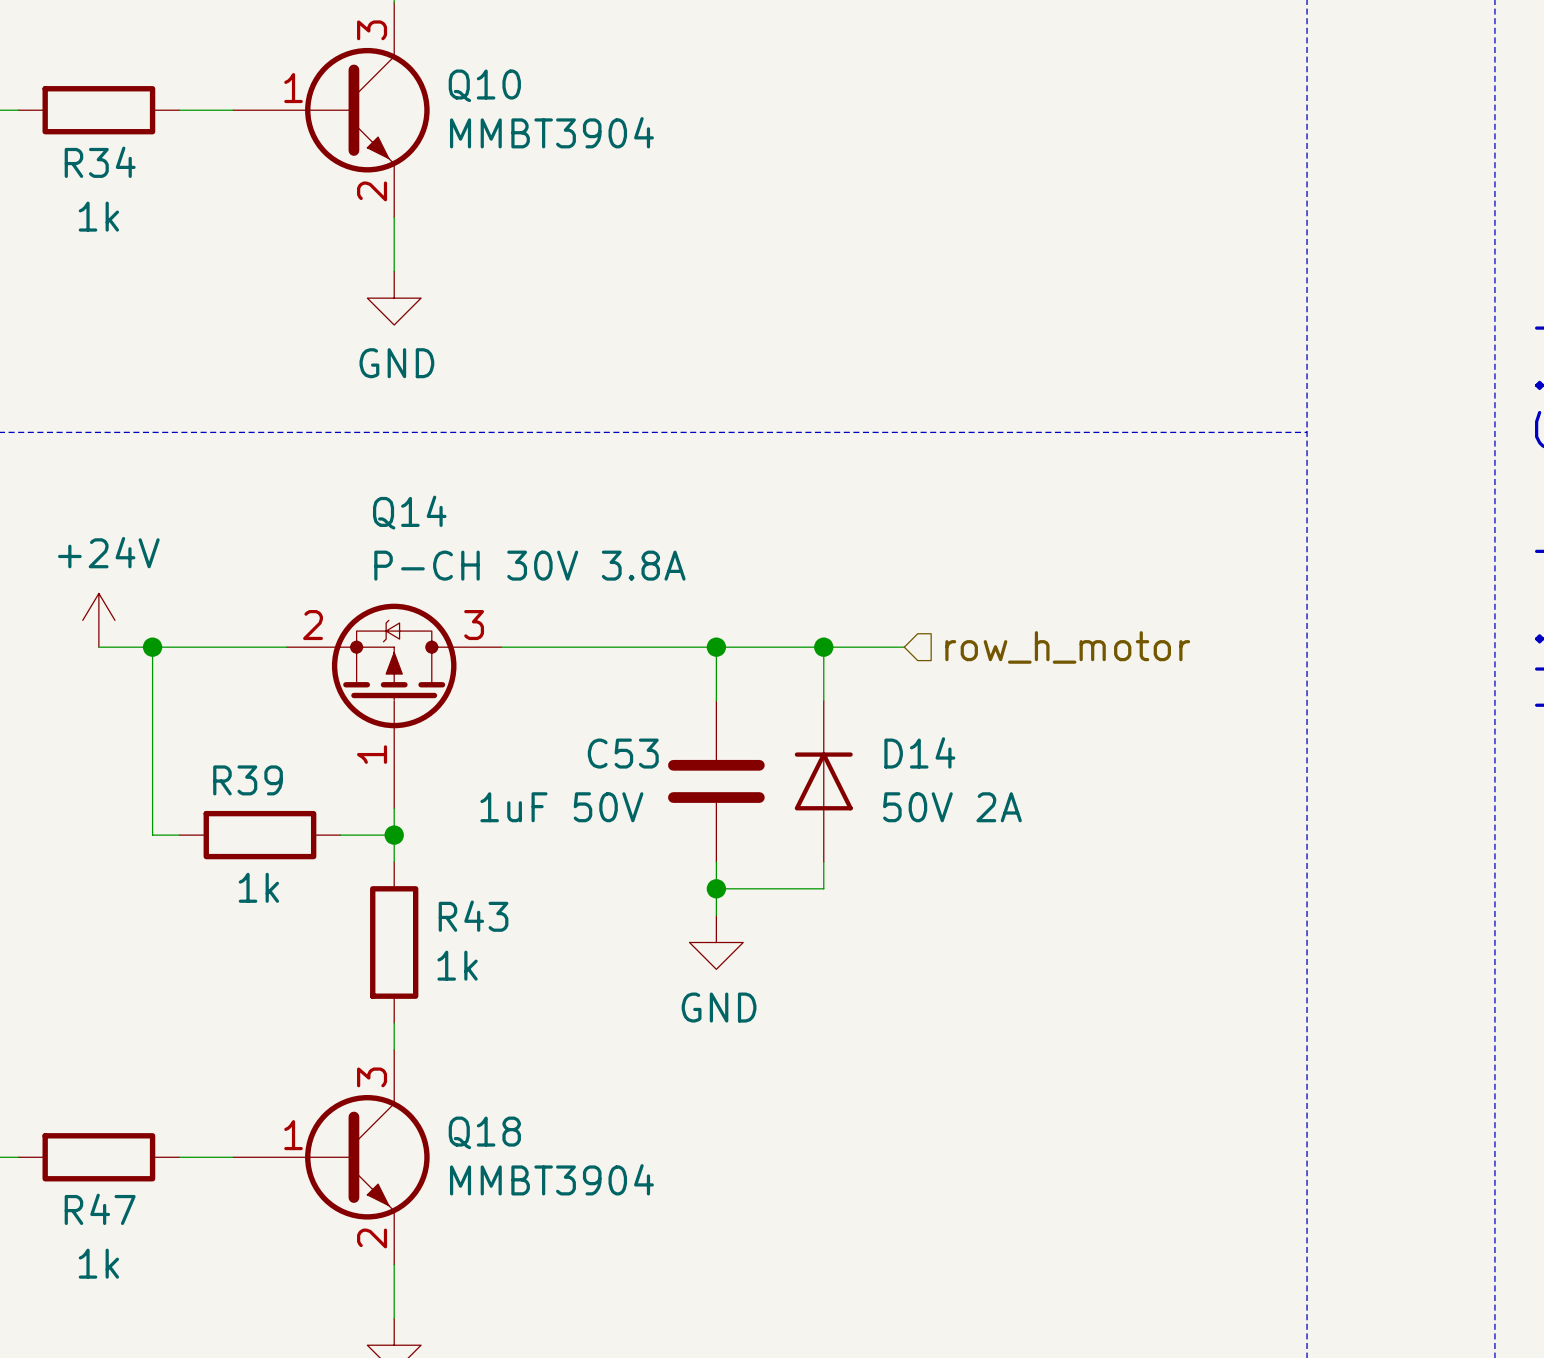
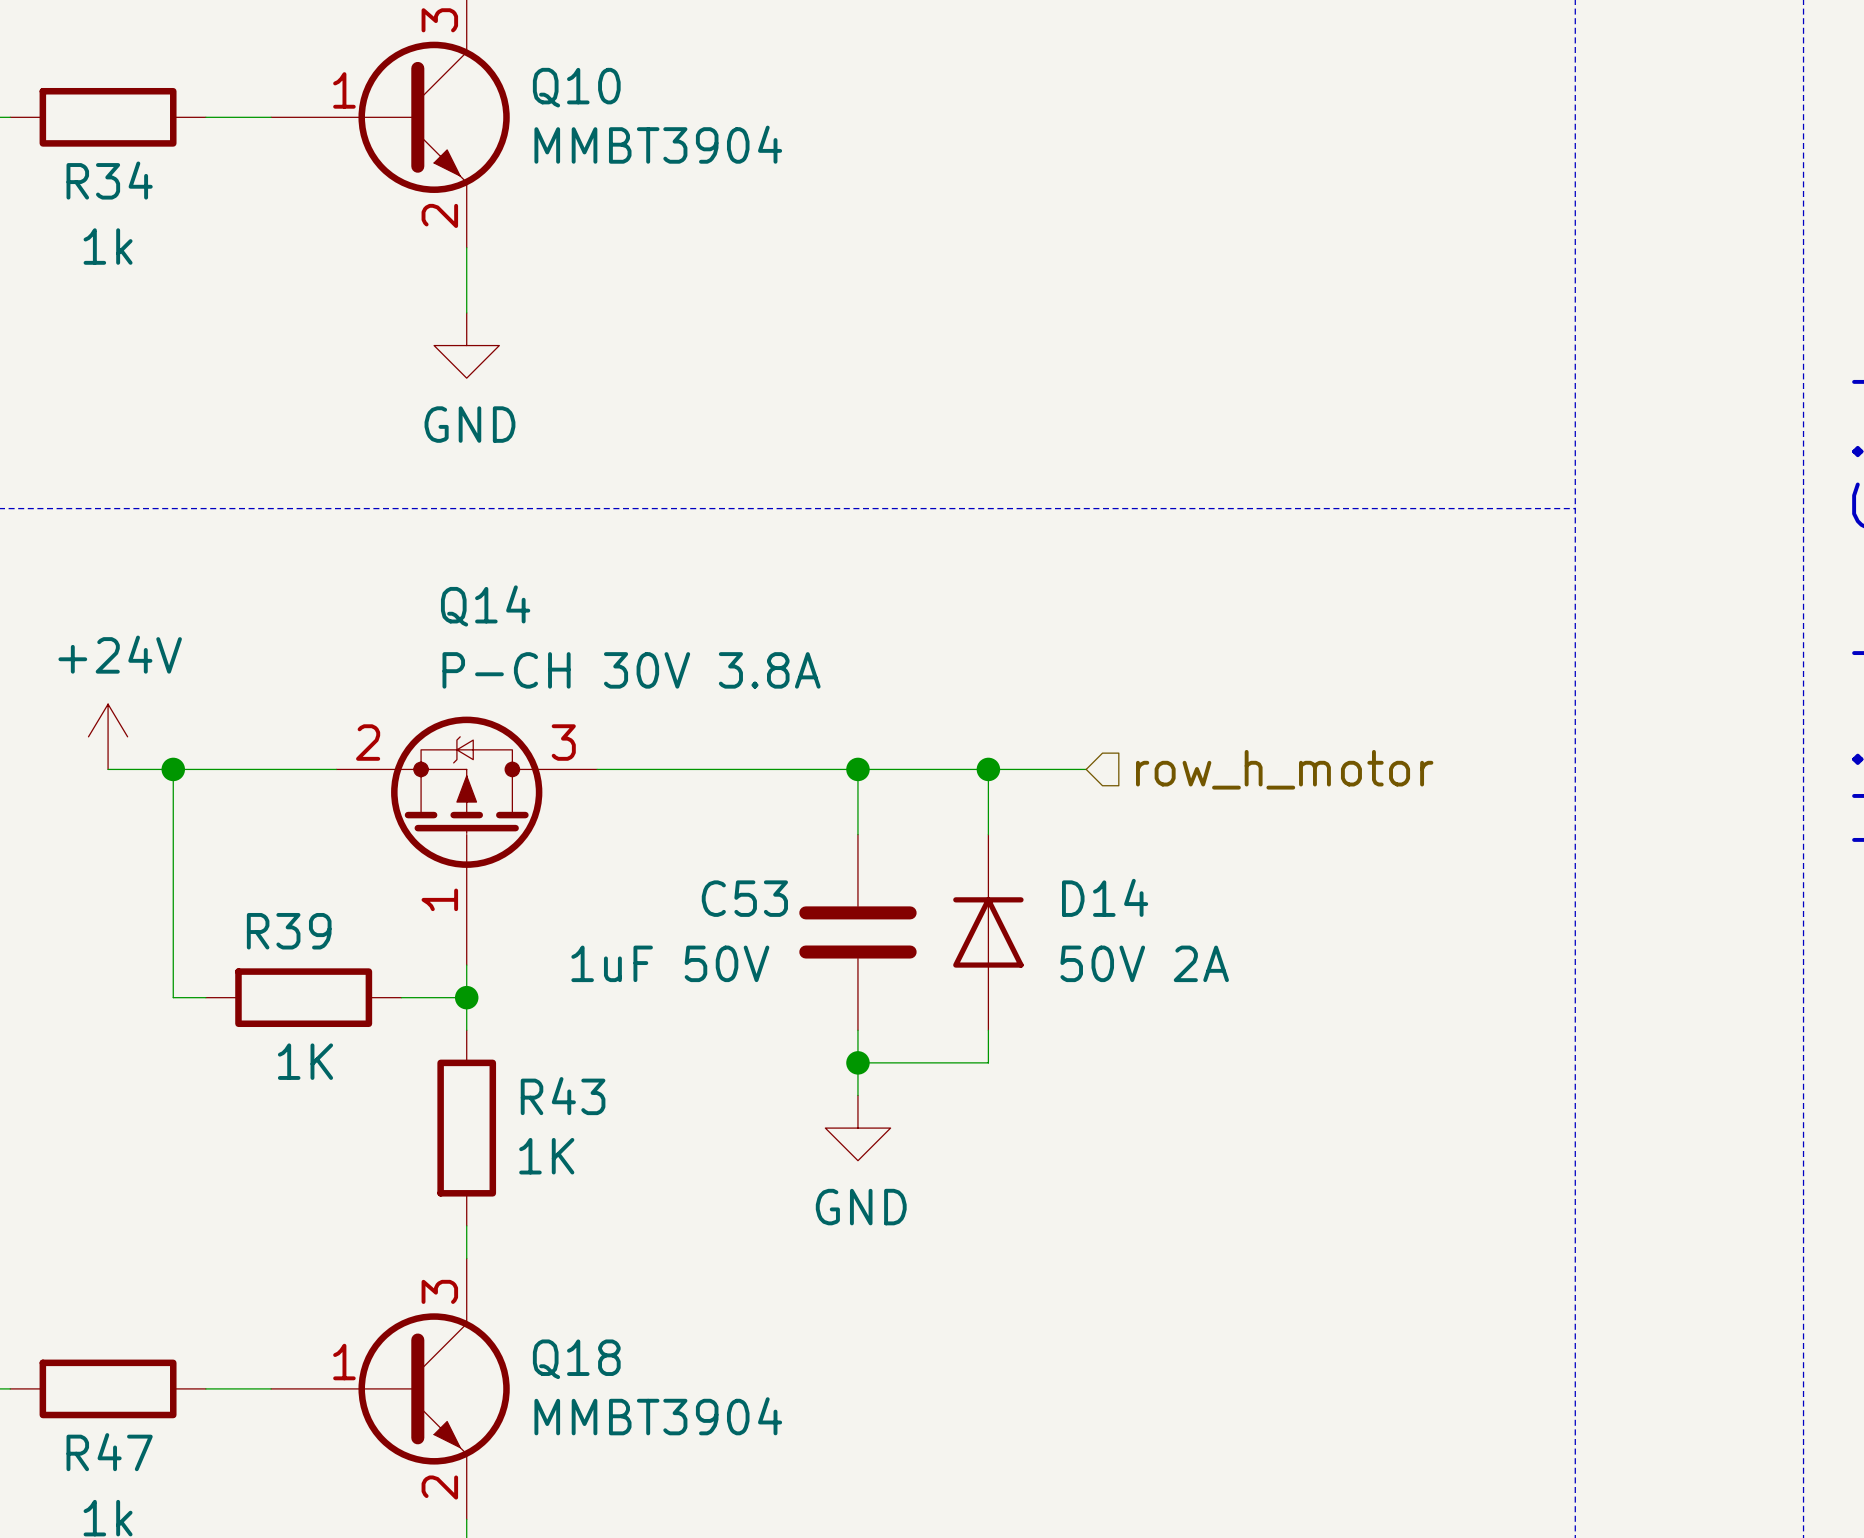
R39 value: 1k (258, 887) -> 1K (305, 1061)
R43 value: 1k (457, 965) -> 1K (546, 1156)

